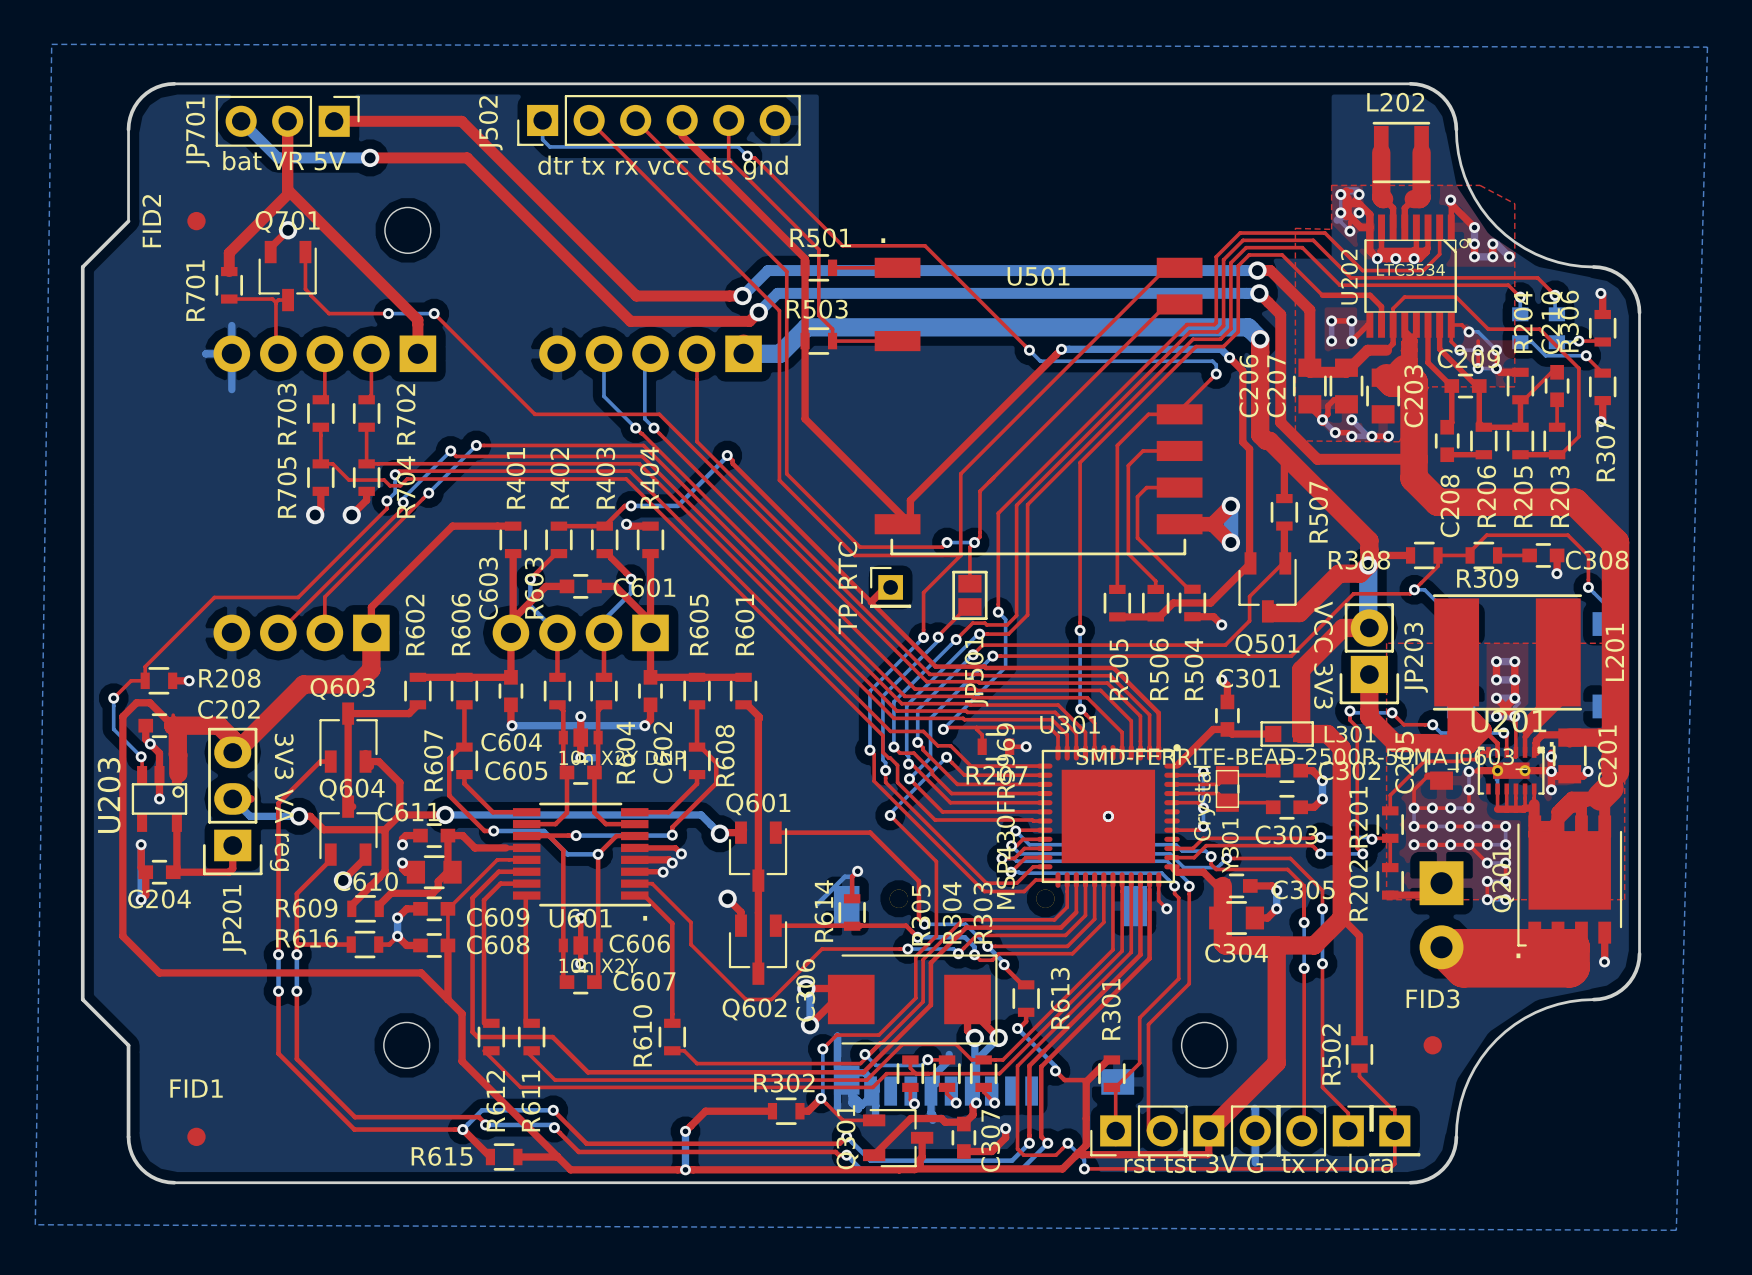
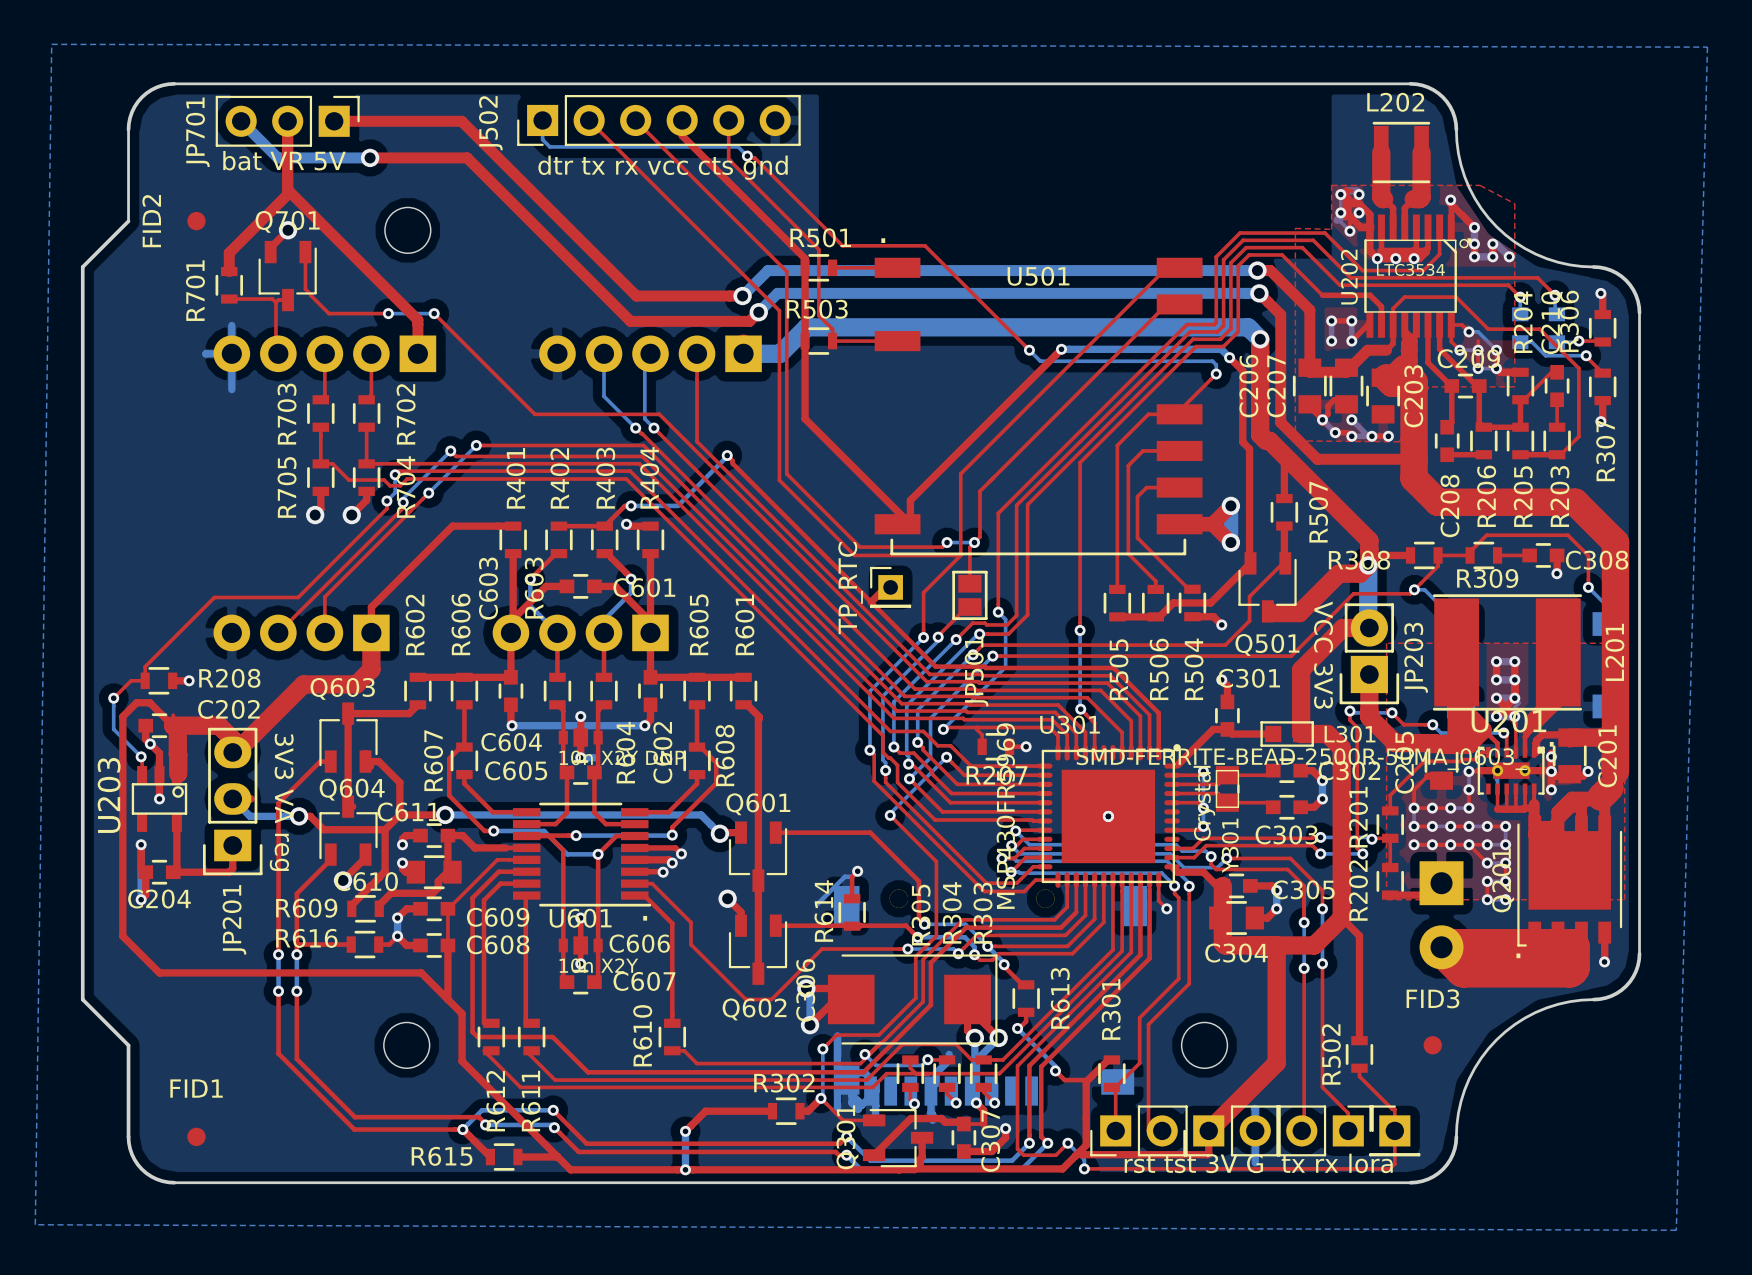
top track: (976, 1102) (973, 1106) (973, 1114) (963, 1124) -> (976, 1102) (983, 1110) (983, 1124) (963, 1124)

